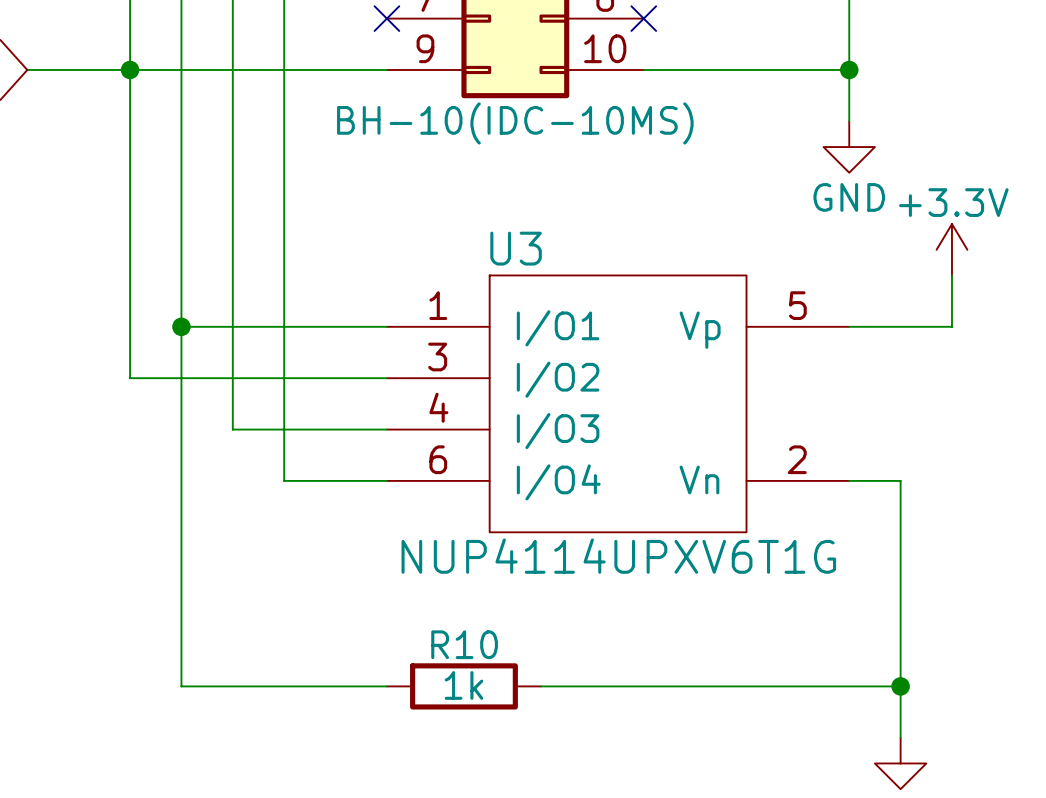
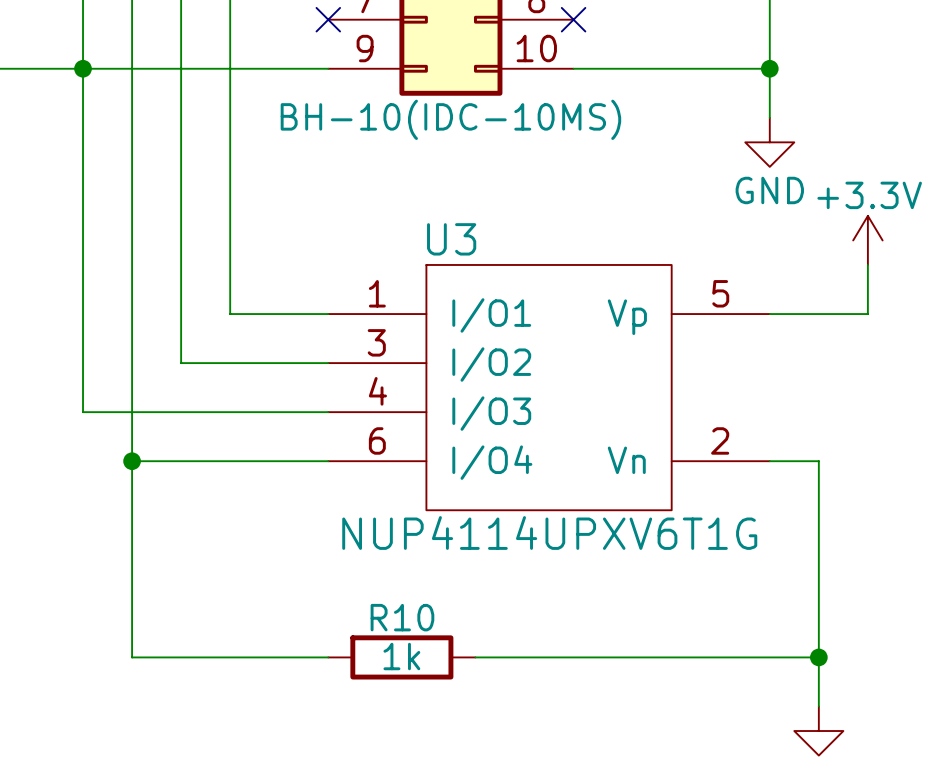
wire: (181, 326) (284, 326) (284, 480) -> (132, 461) (230, 461)
junction: (181, 326) -> none
wire: (130, 378) (232, 378) (232, 429) -> (83, 363) (83, 412) (181, 412)
junction: none -> (132, 461)

